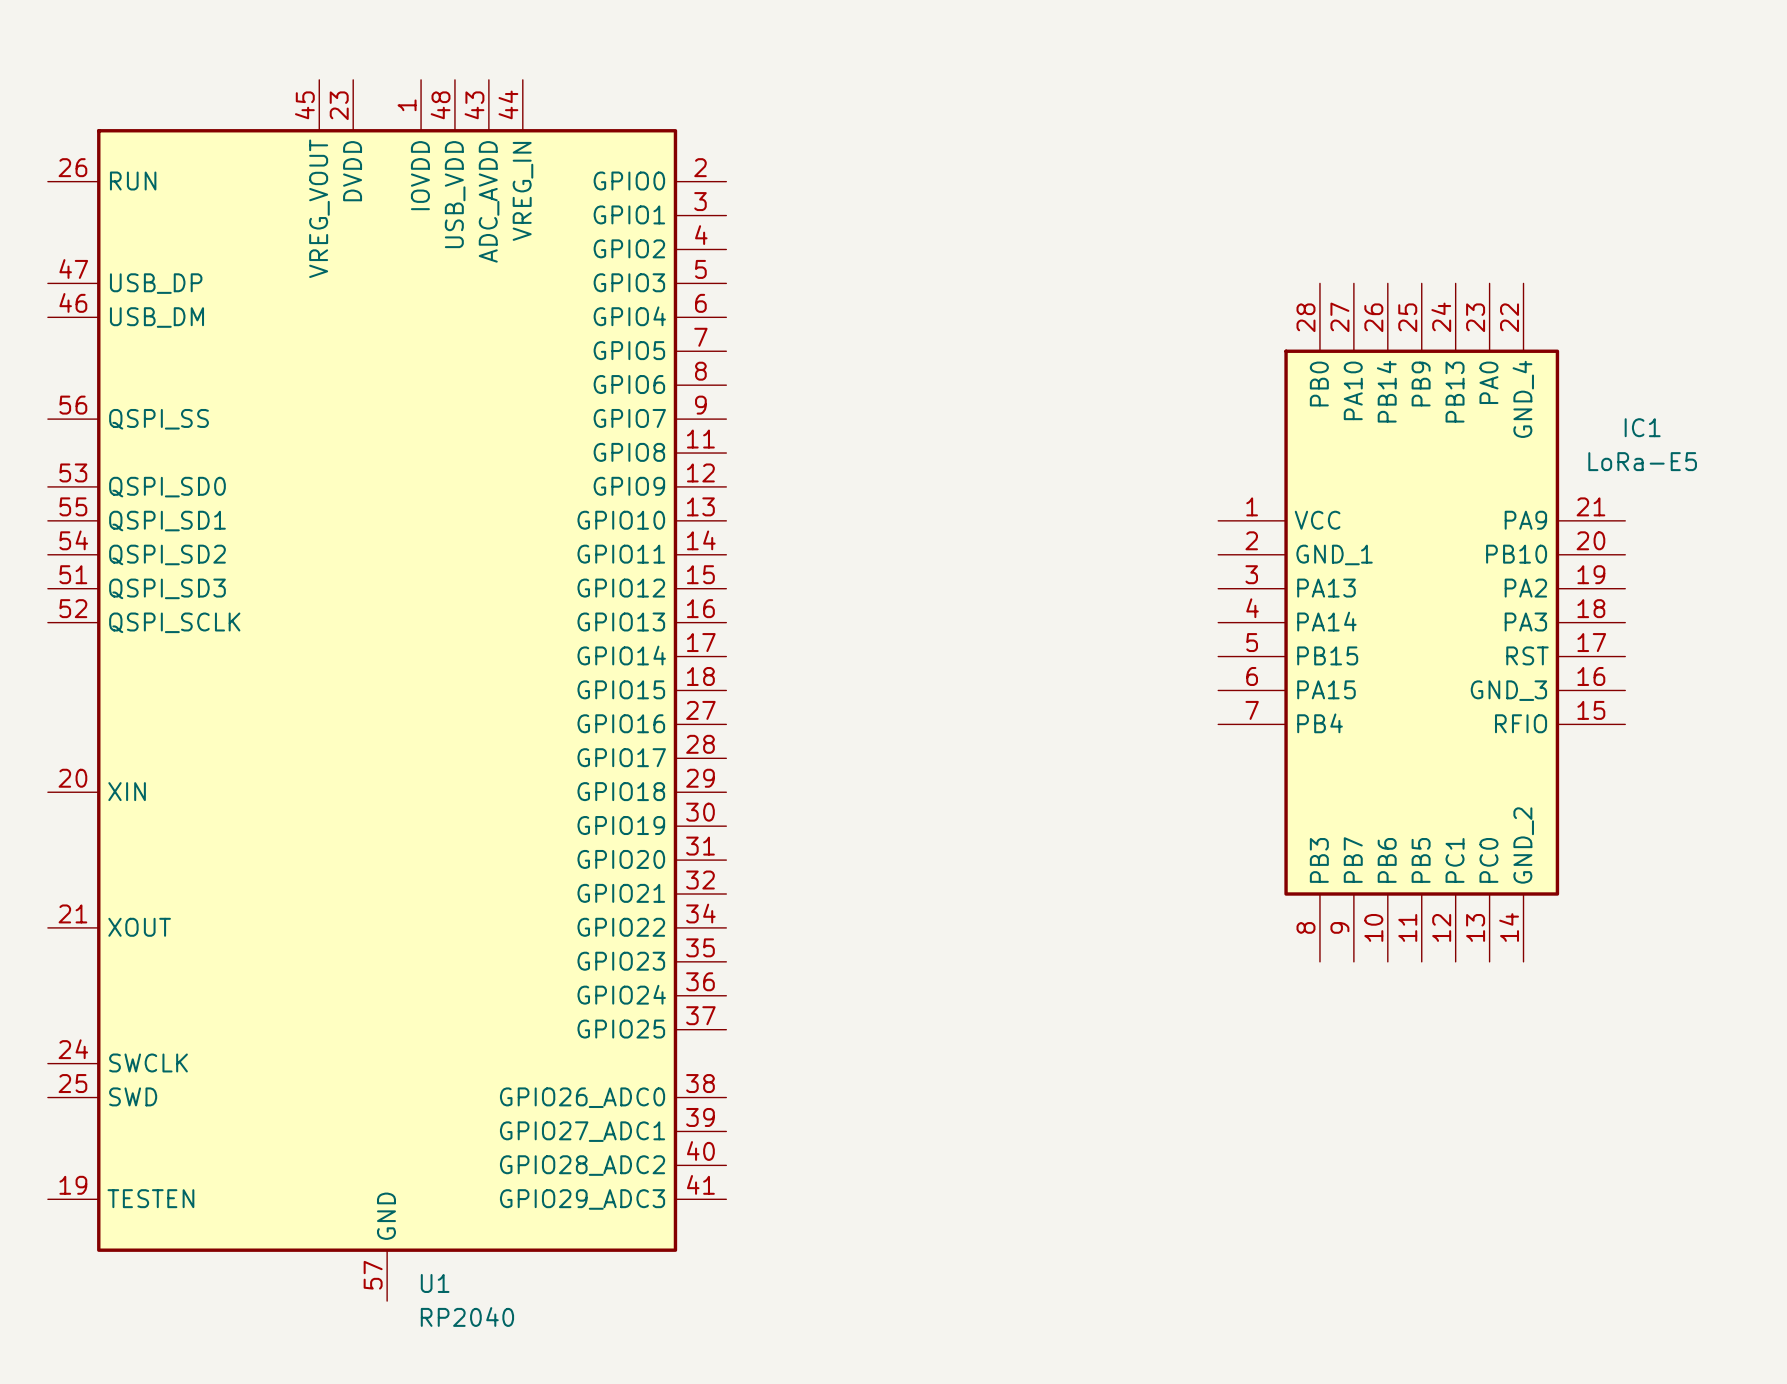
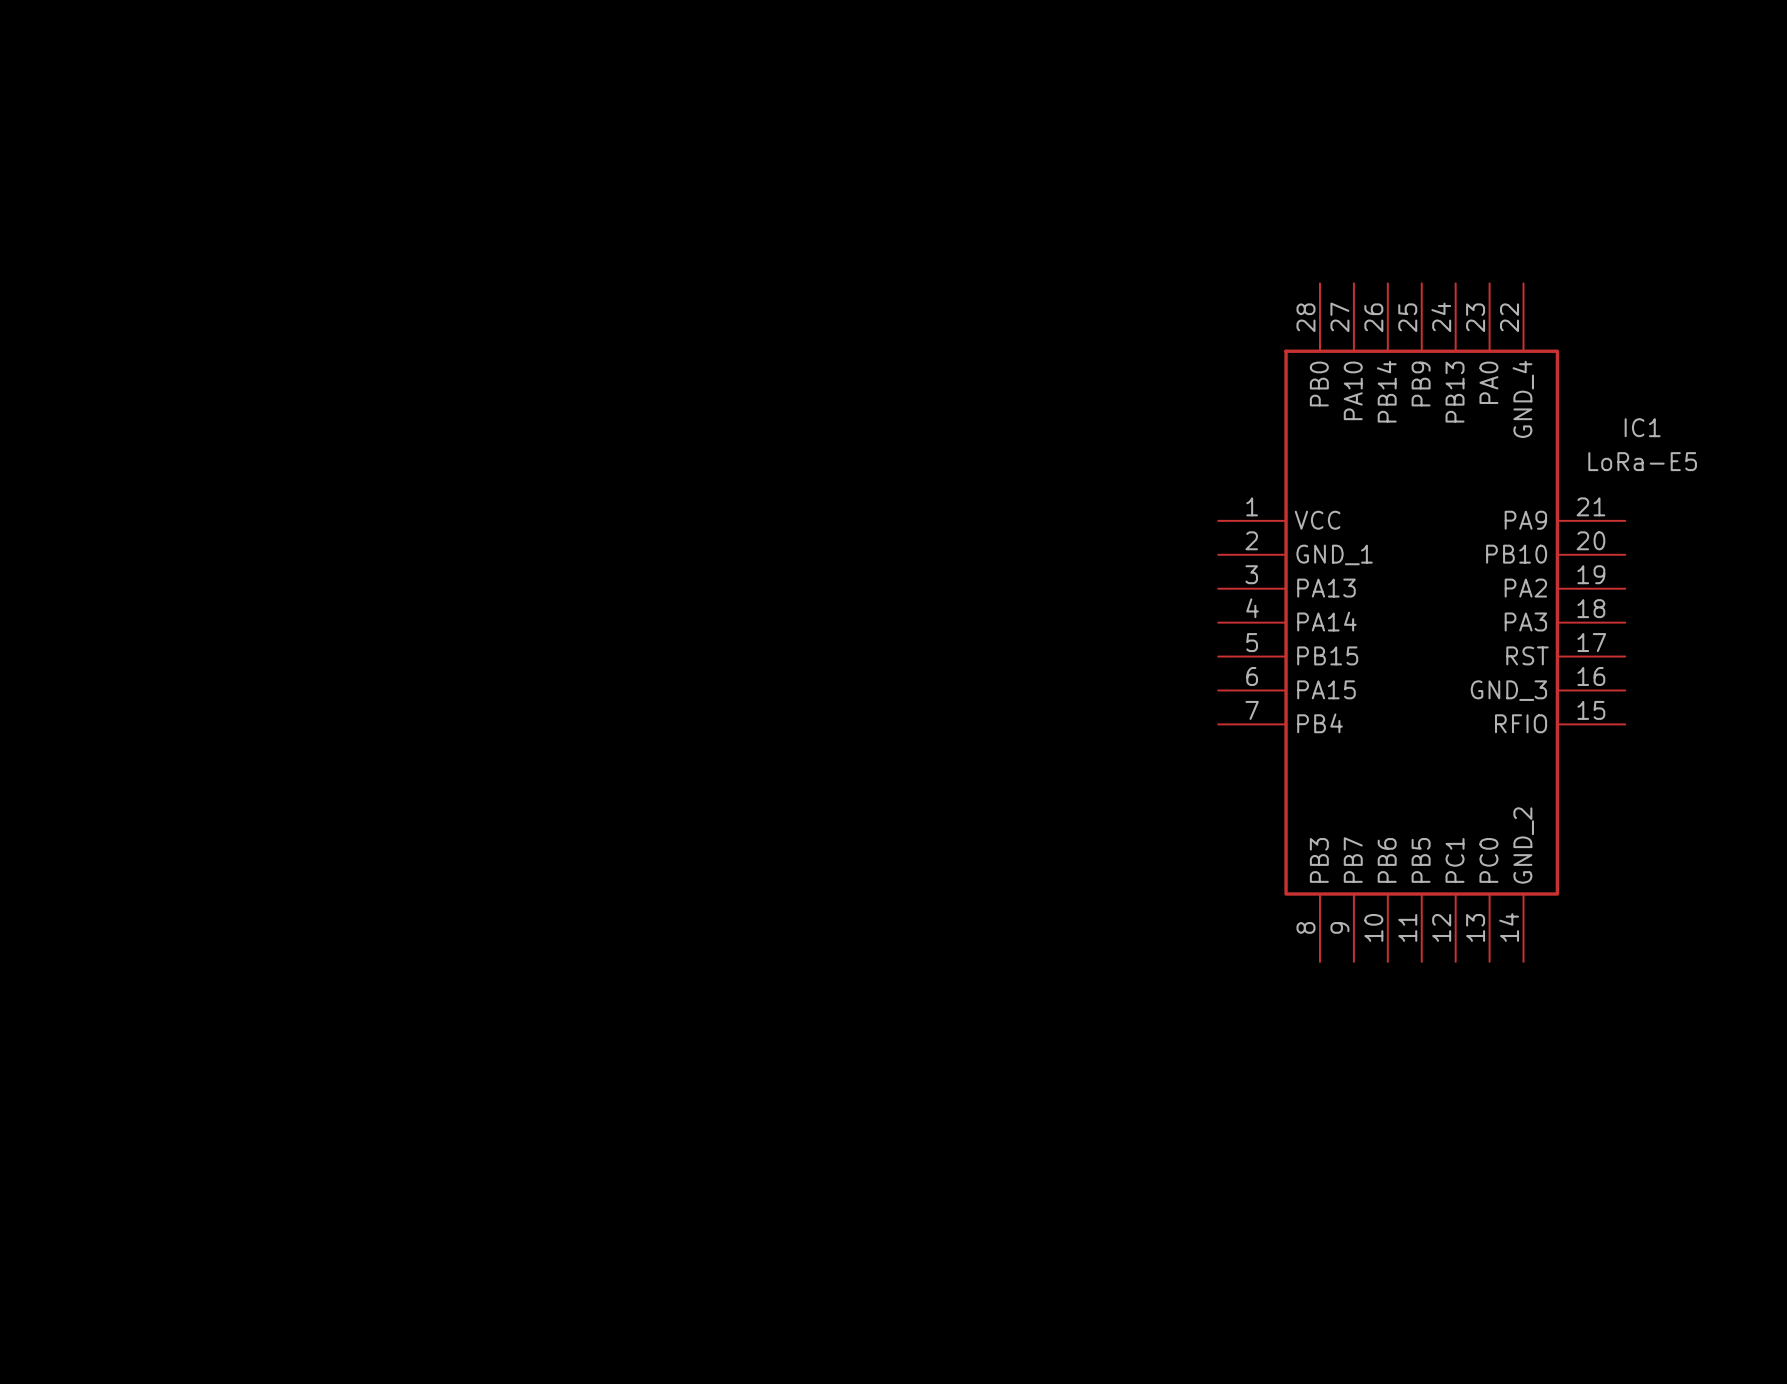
U1: RP2040 (387, 690) -> none

